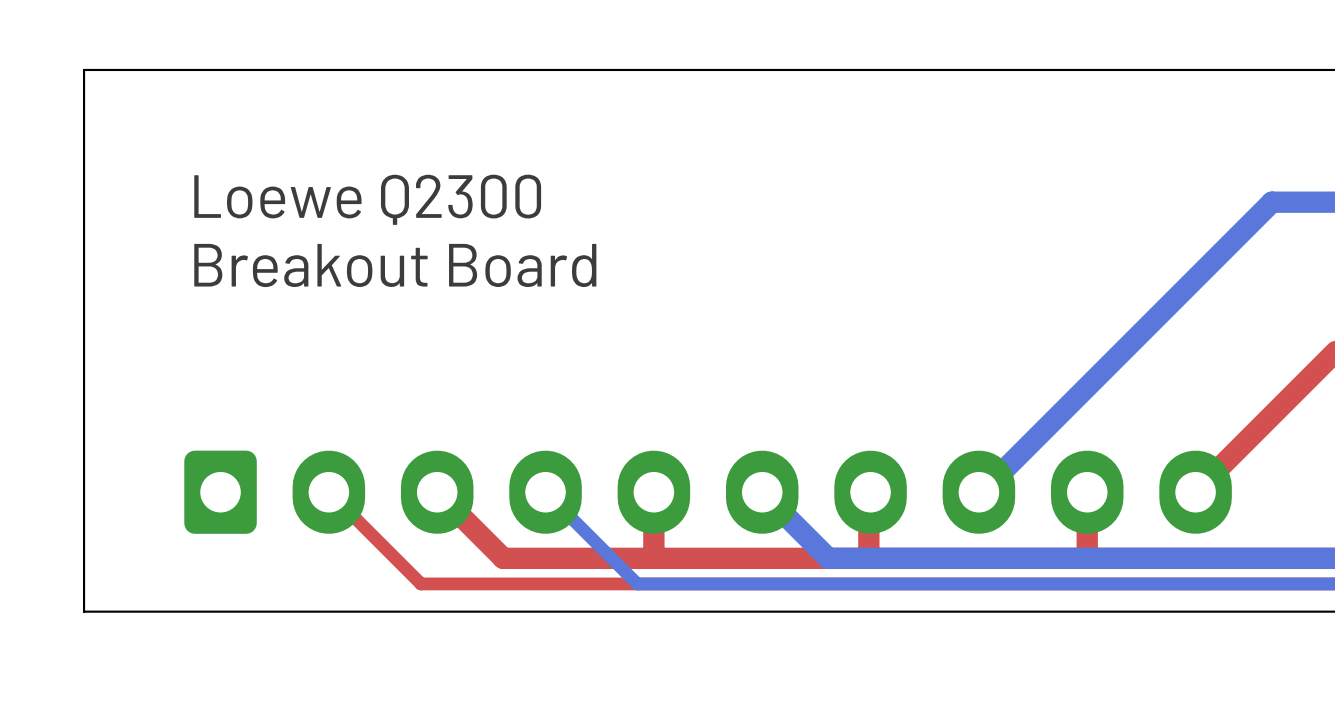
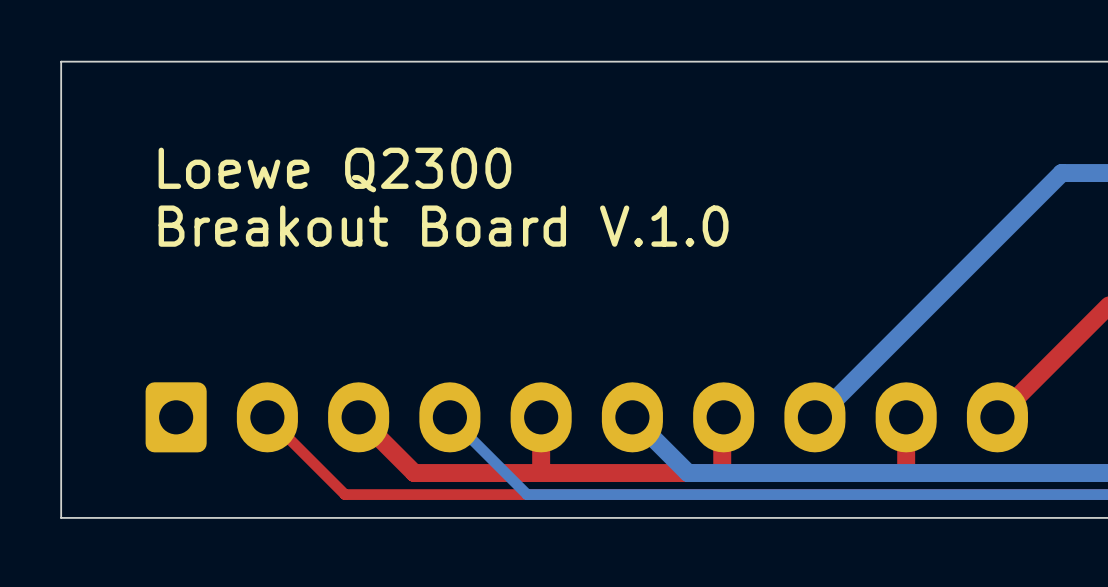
text: Breakout Board (395, 265) -> Breakout Board V.1.0 (443, 226)

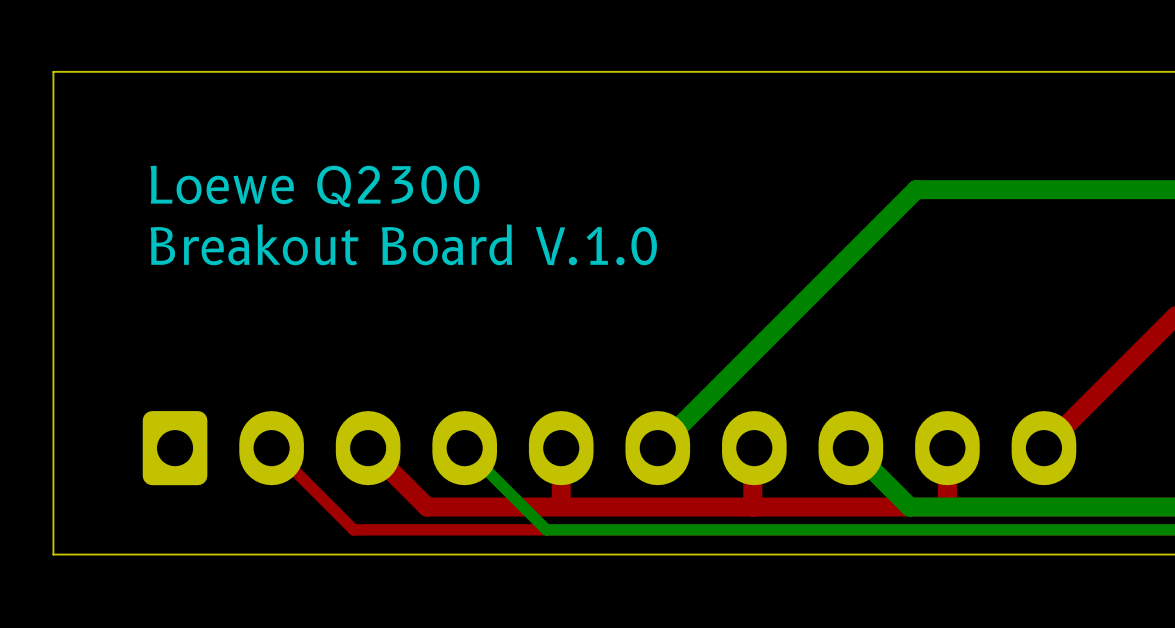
bottom track: (1061, 173) (817, 417) -> (1111, 189) (916, 189) (657, 448)
bottom track: (632, 417) (688, 473) (870, 473) -> (850, 448) (909, 507)

